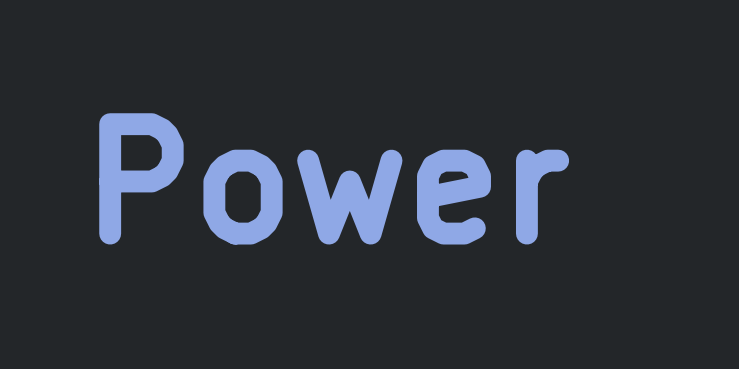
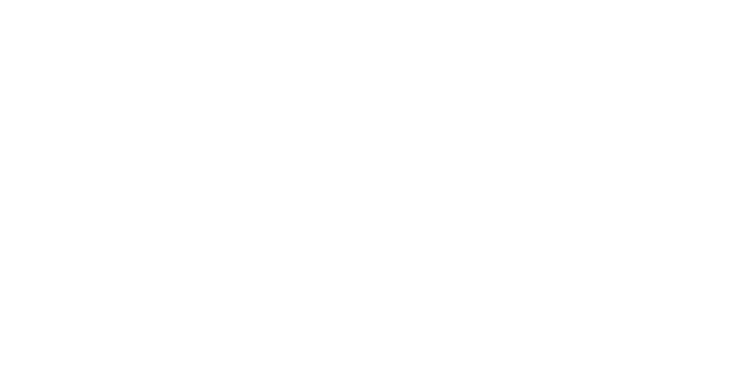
text: Power (334, 178) -> none

